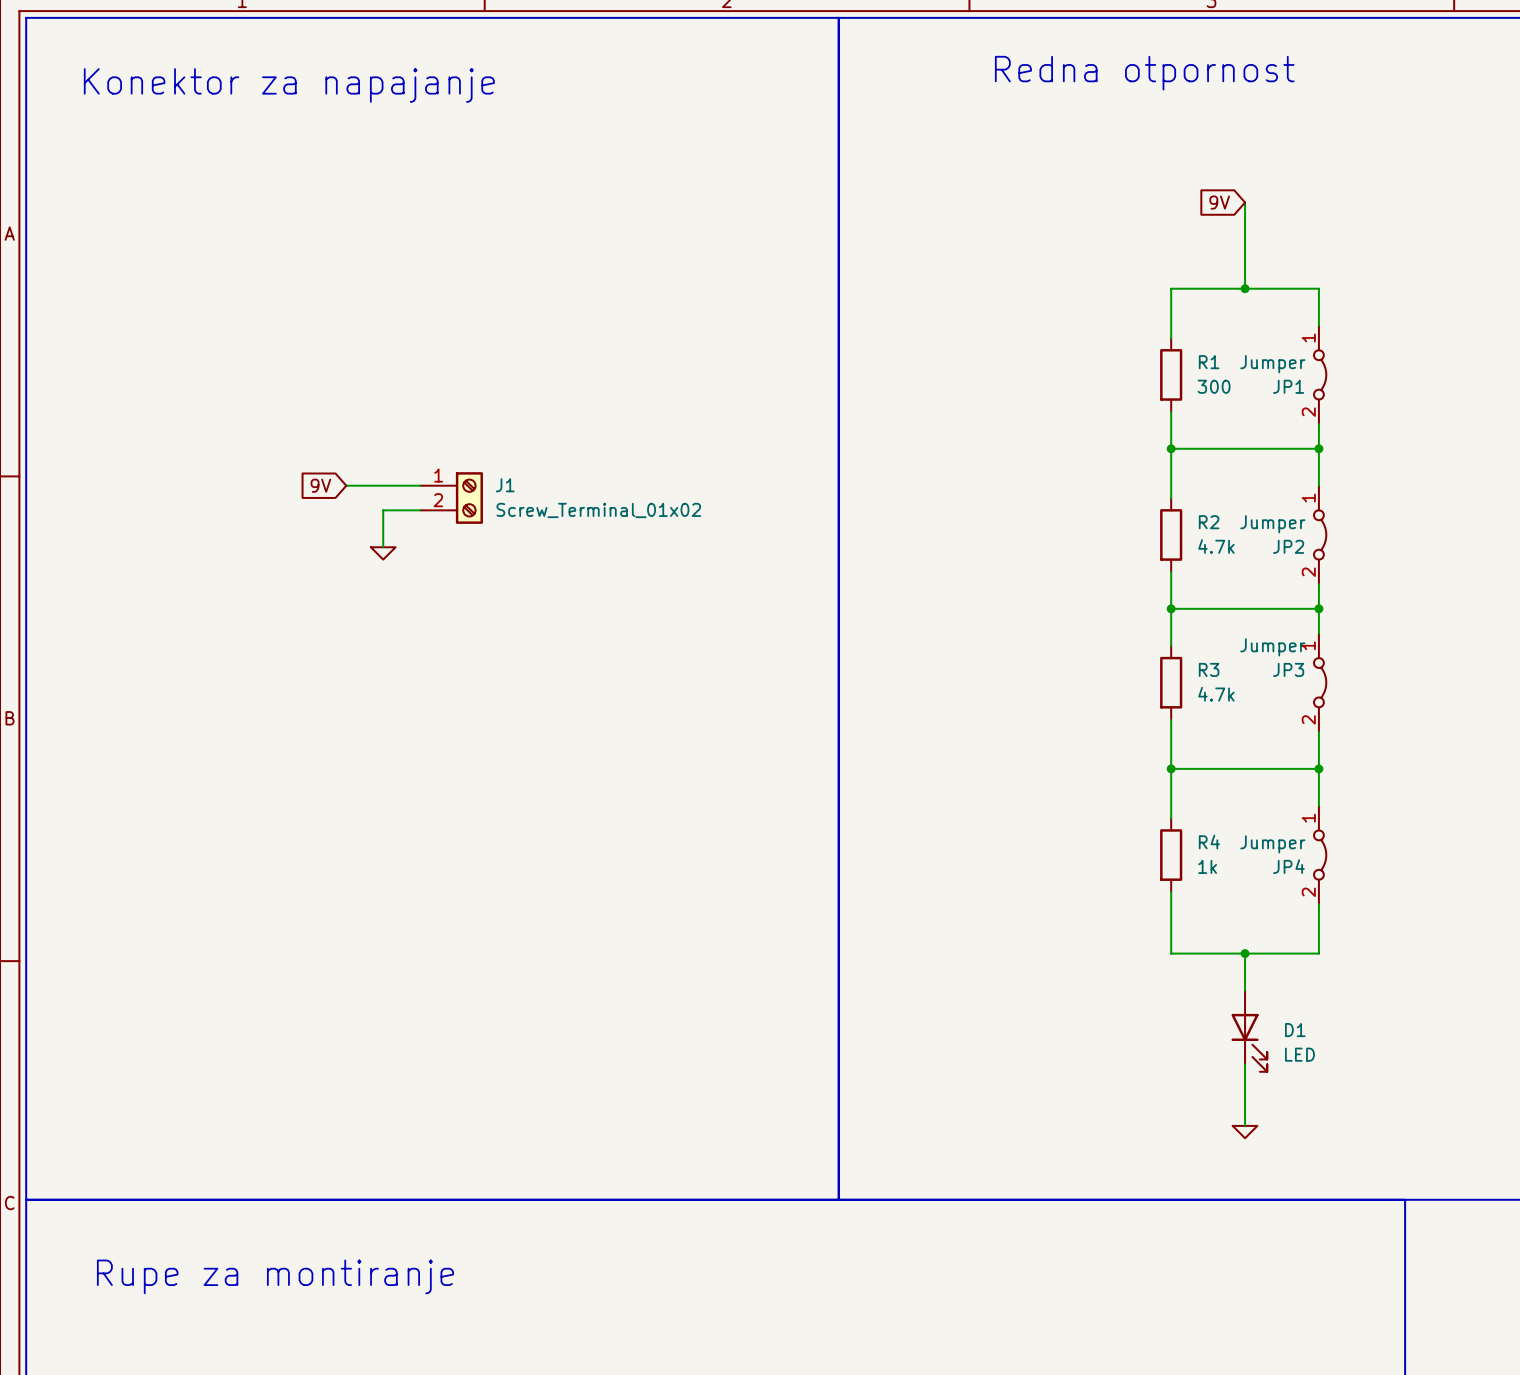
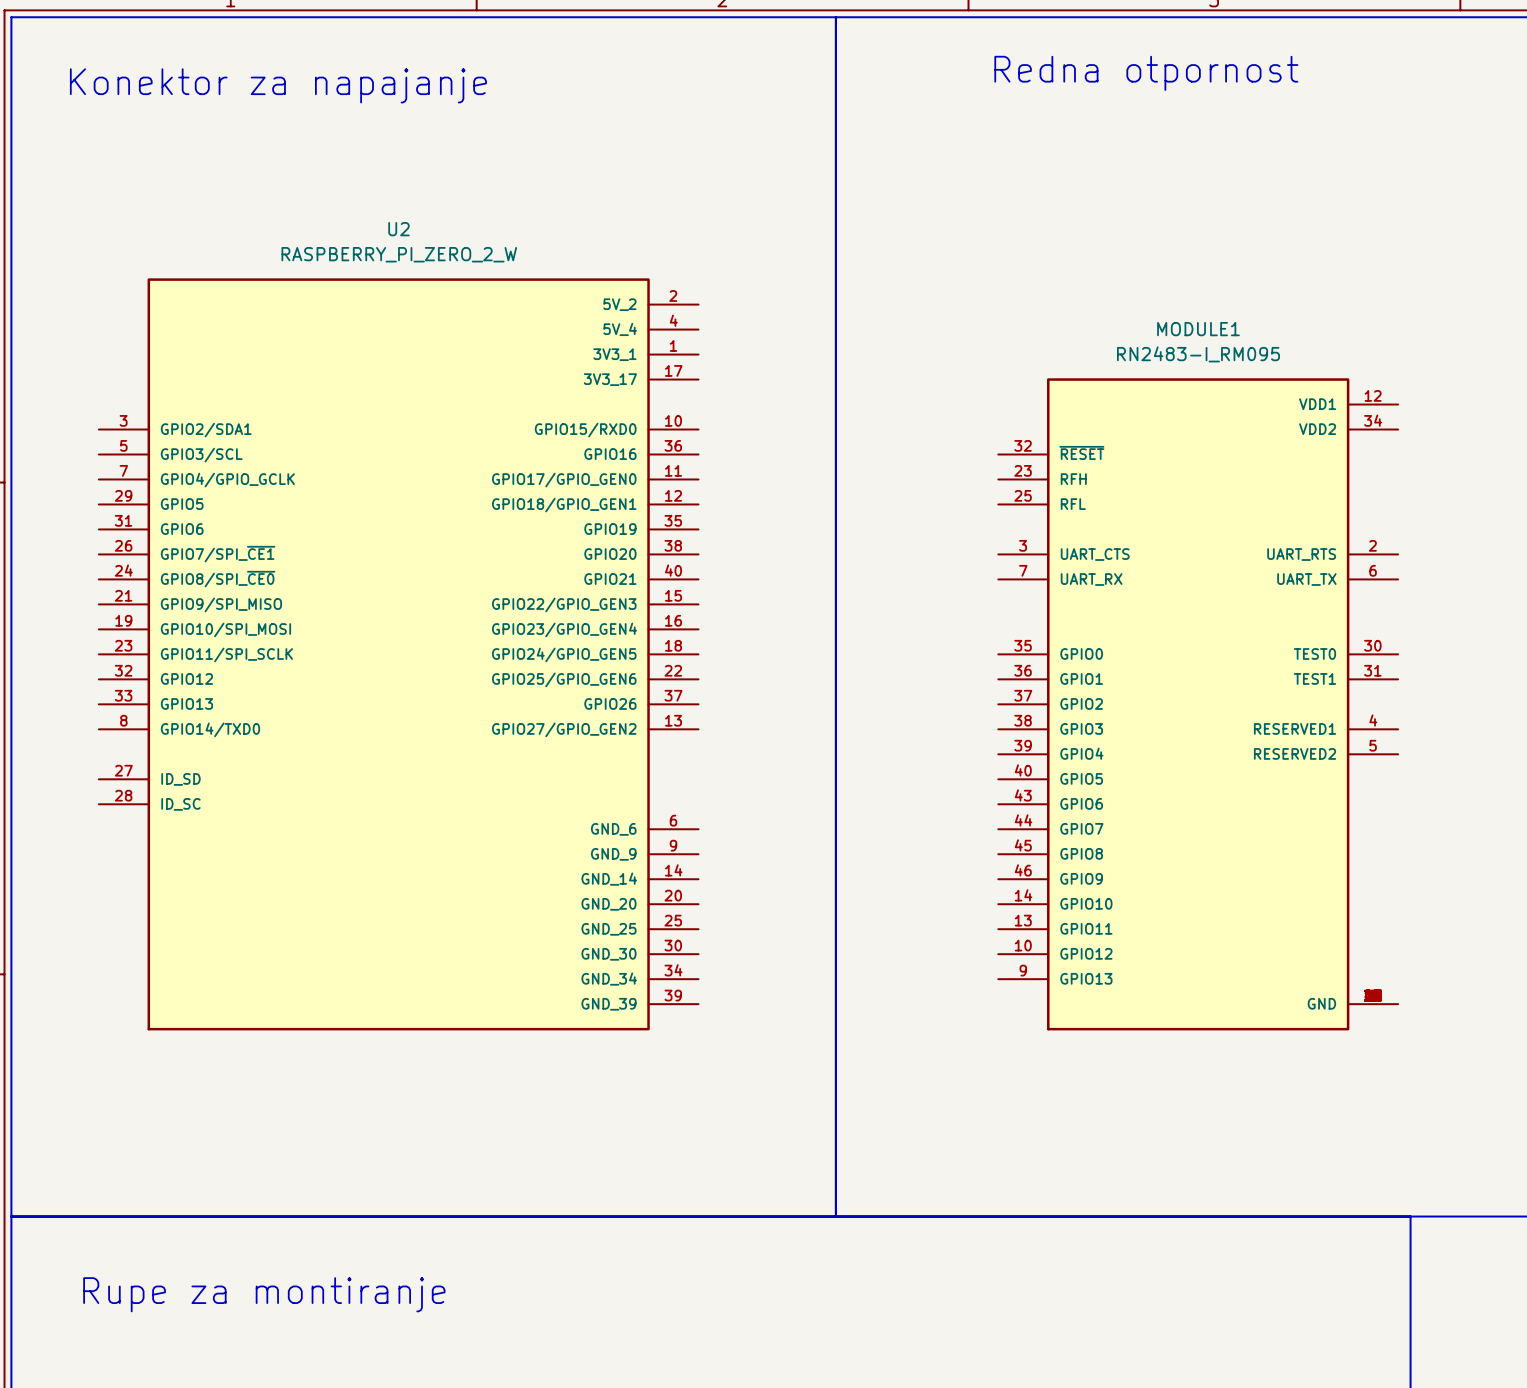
global label: 9V (1219, 202) -> none
wire: (1245, 202) (1245, 288) -> none
junction: (1245, 288) -> none
wire: (1318, 325) (1318, 288) (1171, 288) (1171, 337) -> none
R1: 300 (1171, 374) -> none
JP1: Jumper (1320, 374) -> none
junction: (1171, 448) -> none
junction: (1318, 448) -> none
global label: 9V (320, 485) -> none
J1: Screw_Terminal_01x02 (451, 498) -> none
R2: 4.7k (1171, 534) -> none
JP2: Jumper (1320, 534) -> none
power symbol: (383, 553) -> none
junction: (1171, 608) -> none
junction: (1318, 608) -> none
U2: none -> RASPBERRY_PI_ZERO_2_W (398, 654)
R3: 4.7k (1171, 682) -> none
JP3: Jumper (1320, 682) -> none
MODULE1: none -> RN2483-I_RM095 (1198, 704)
junction: (1171, 768) -> none
junction: (1318, 768) -> none
R4: 1k (1171, 855) -> none
JP4: Jumper (1320, 855) -> none
junction: (1245, 953) -> none
D1: LED (1249, 1031) -> none
wire: (1245, 1064) (1245, 1125) -> none
power symbol: (1245, 1132) -> none

